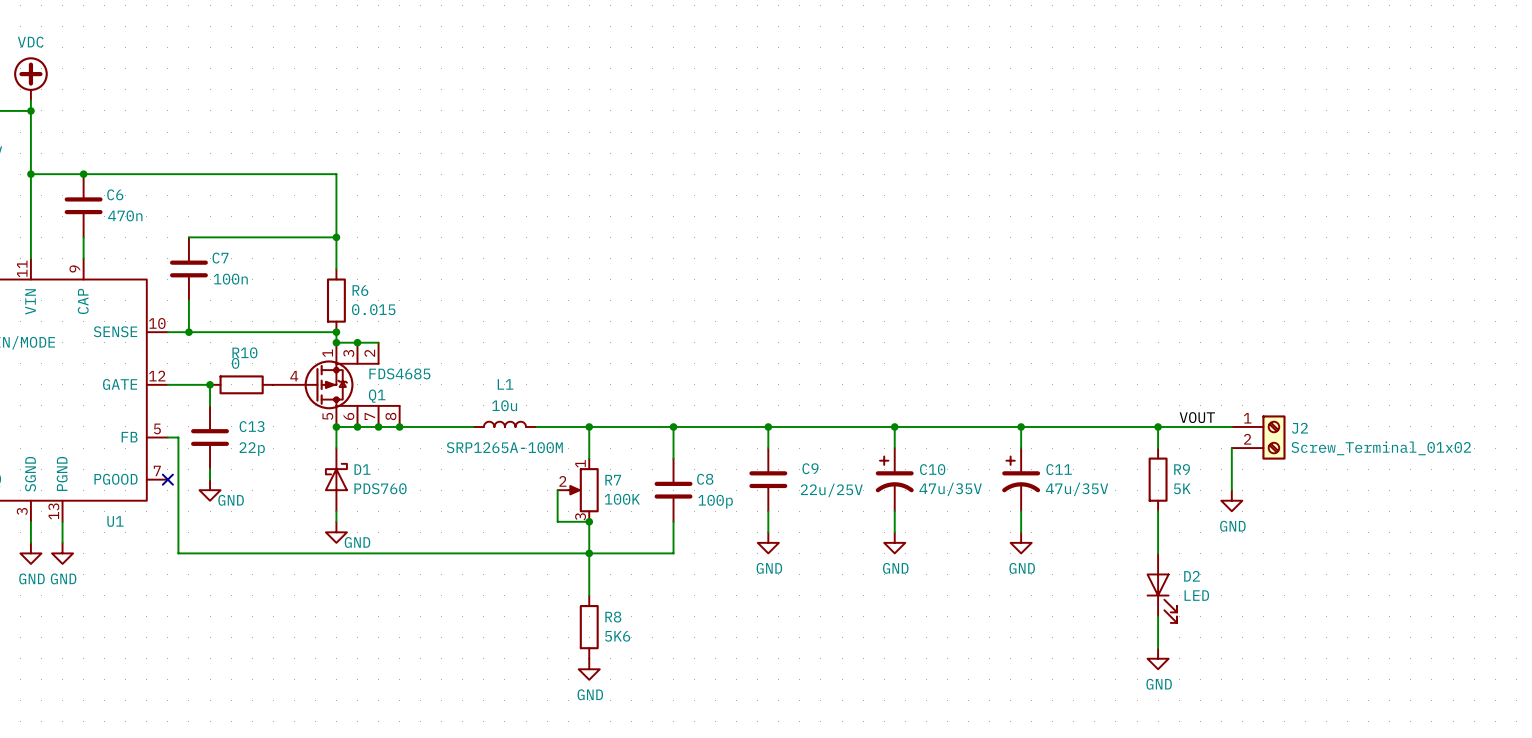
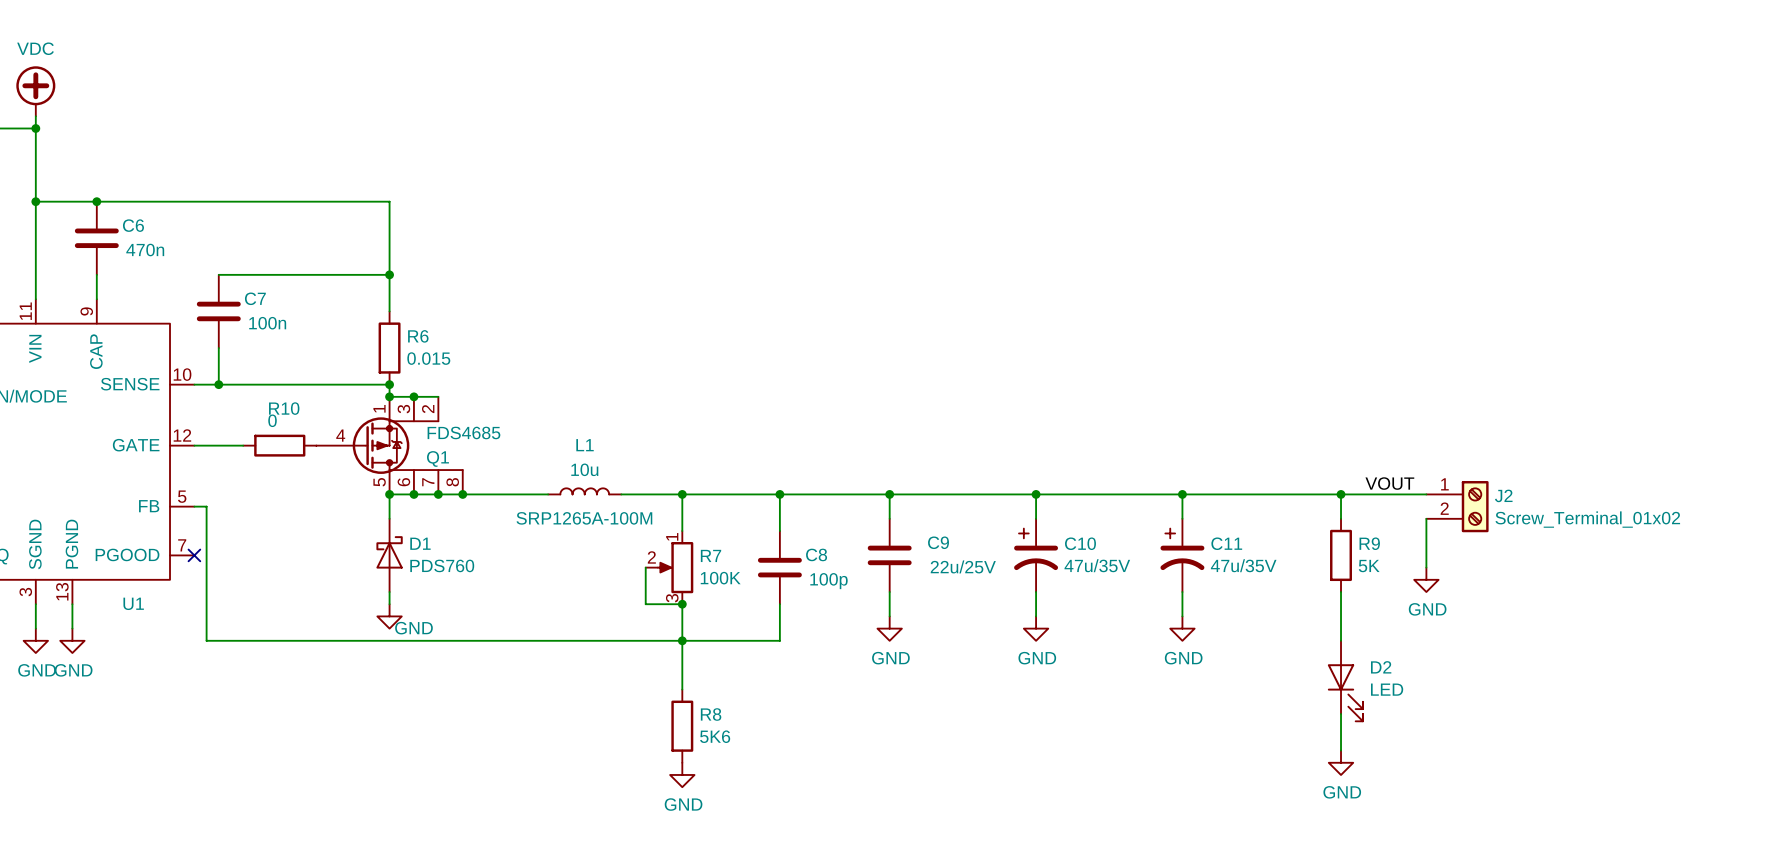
wire: (210, 384) (210, 405) -> none
junction: (210, 384) -> none
C13: 22p (210, 437) -> none
wire: (210, 469) (210, 479) -> none
power symbol: GND (210, 490) -> none

